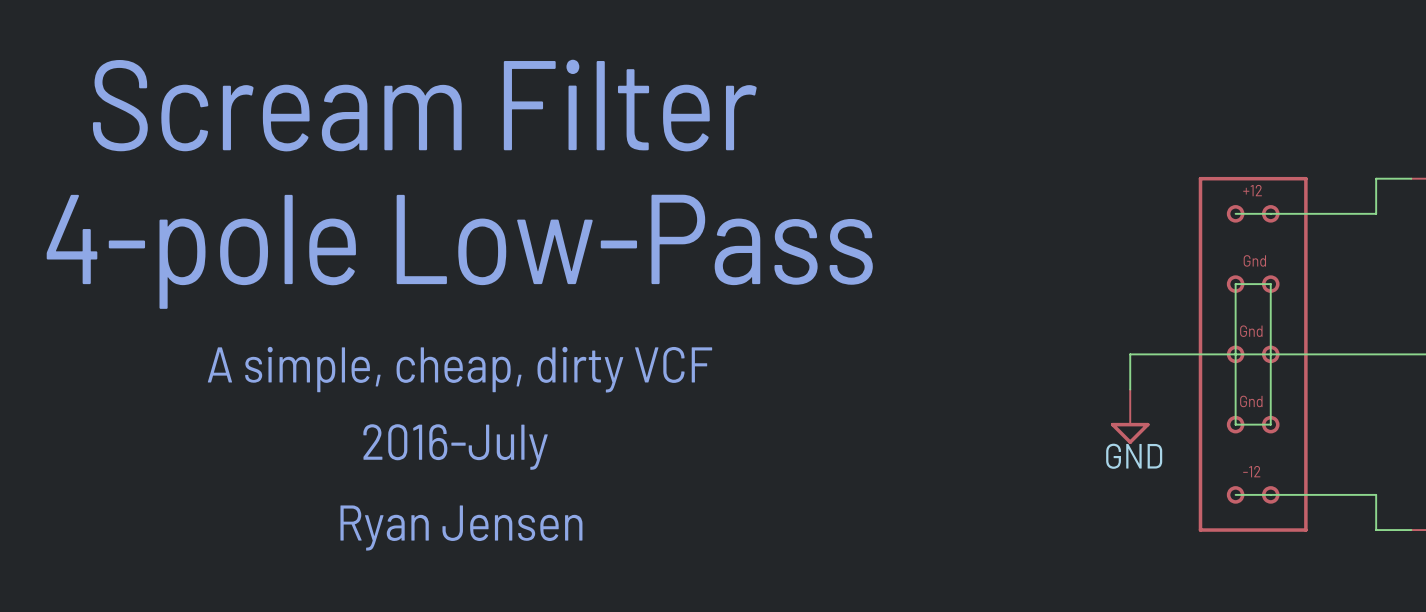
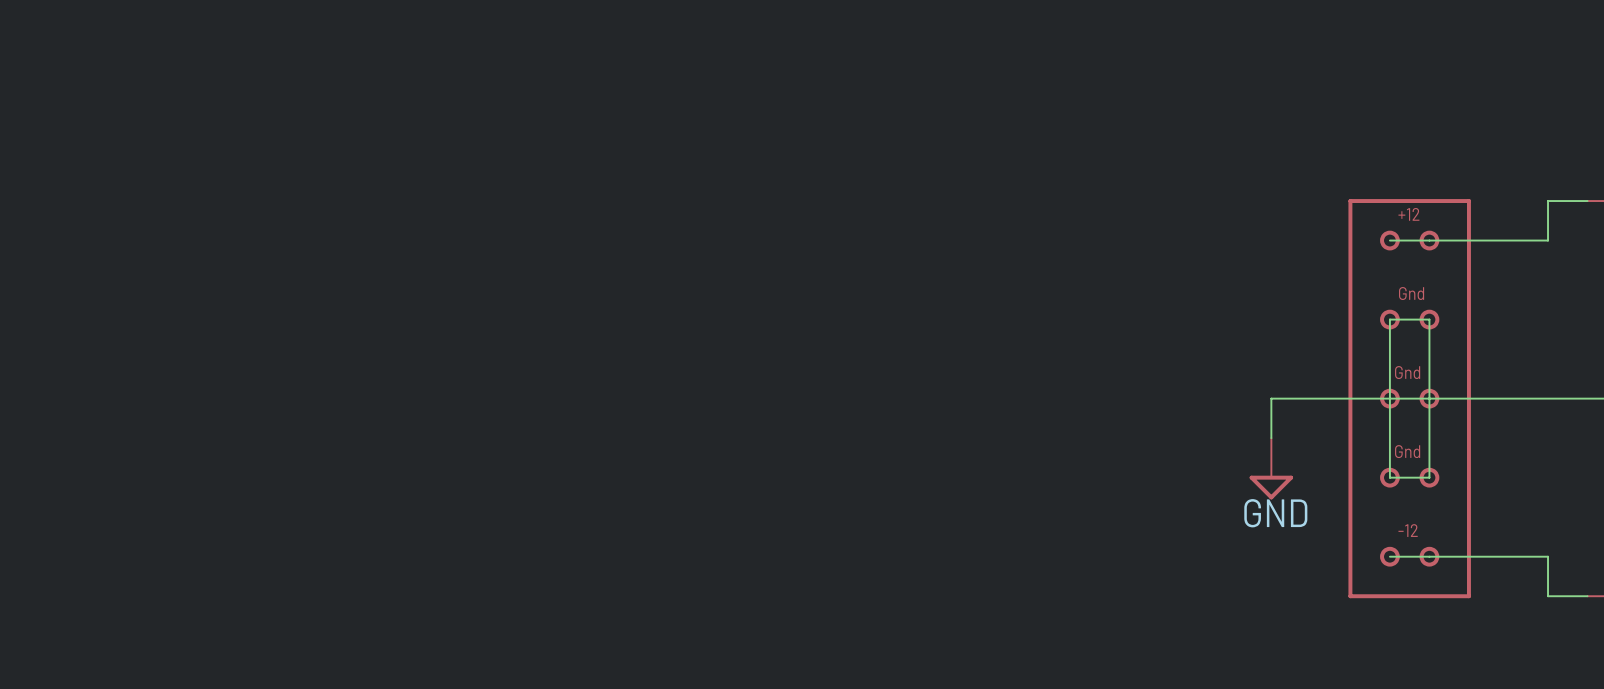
text: Scream Filter (424, 105) -> none
text: 4-pole Low-Pass (459, 251) -> none
text: A simple, cheap, dirty VCF (459, 369) -> none
text: 2016-July (455, 446) -> none
text: Ryan Jensen (461, 528) -> none

